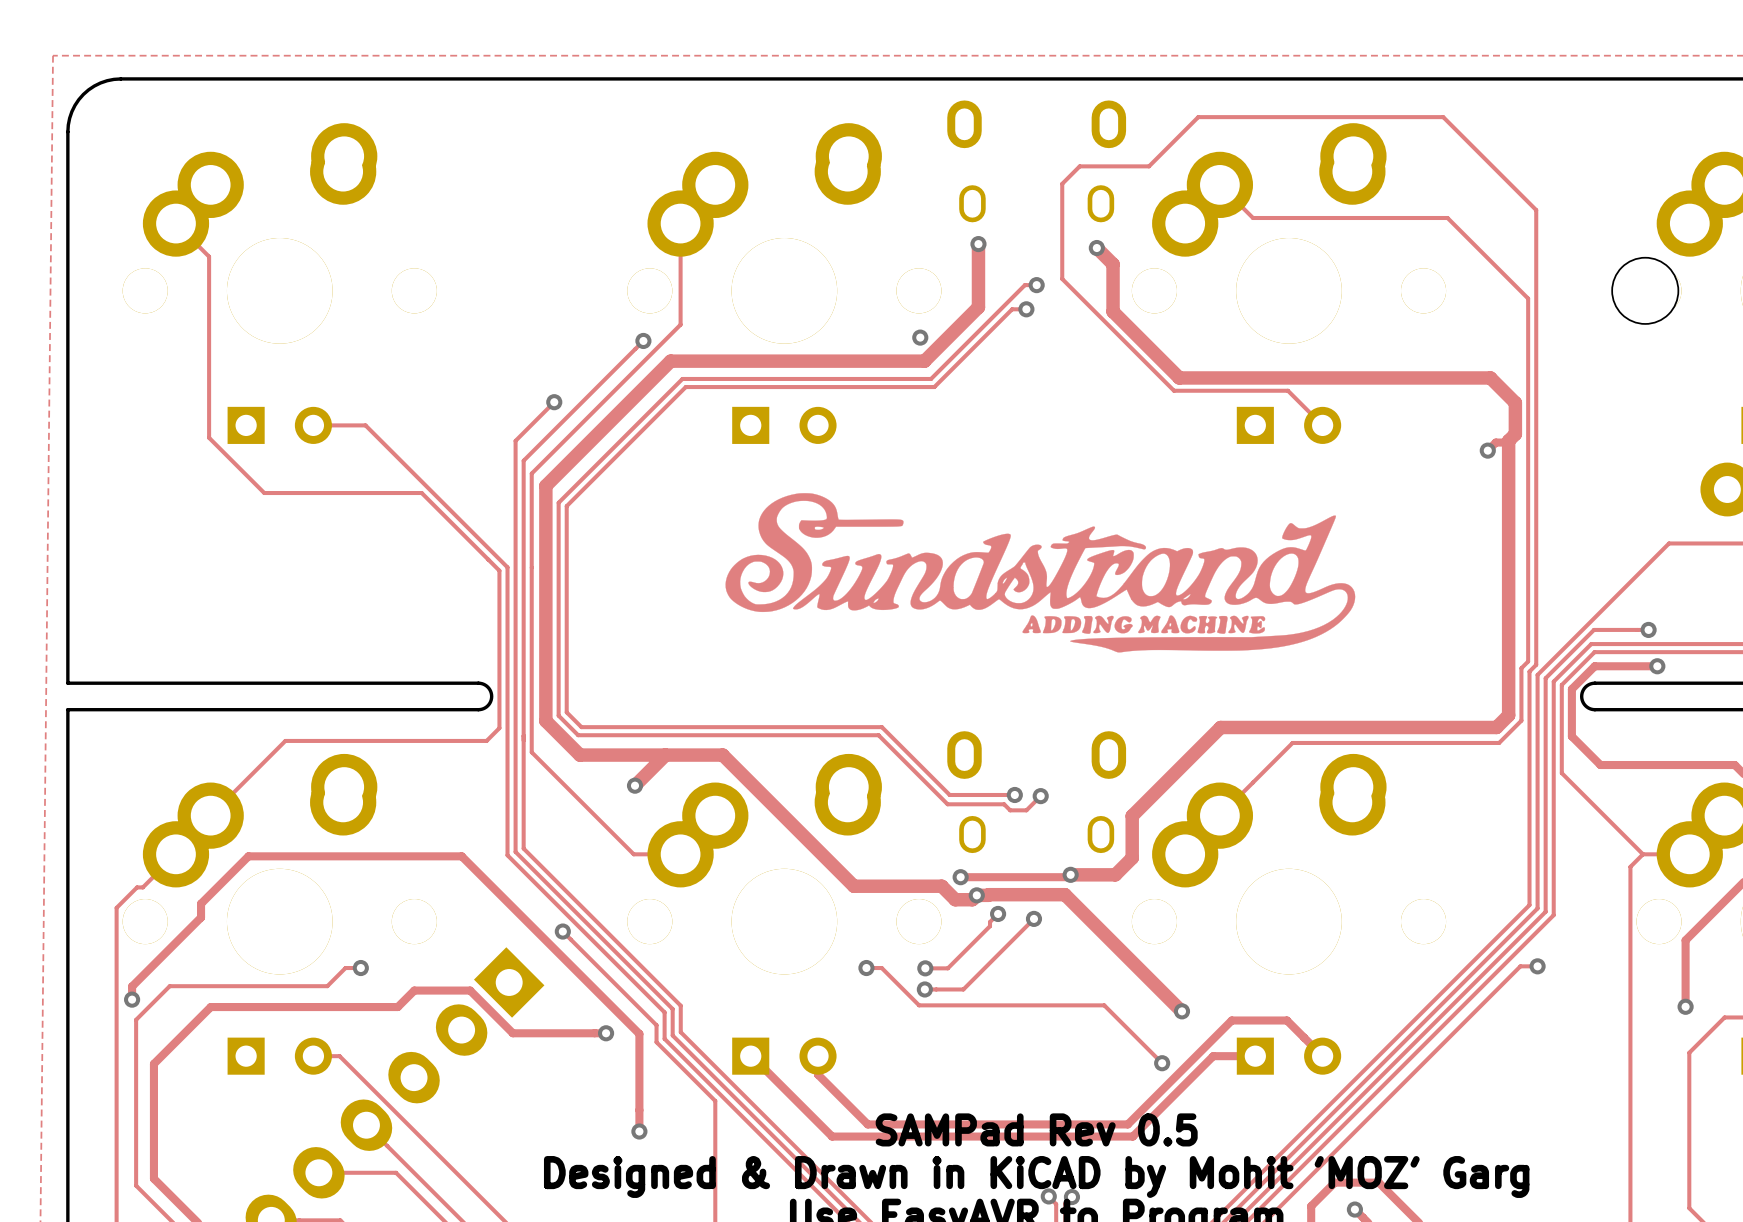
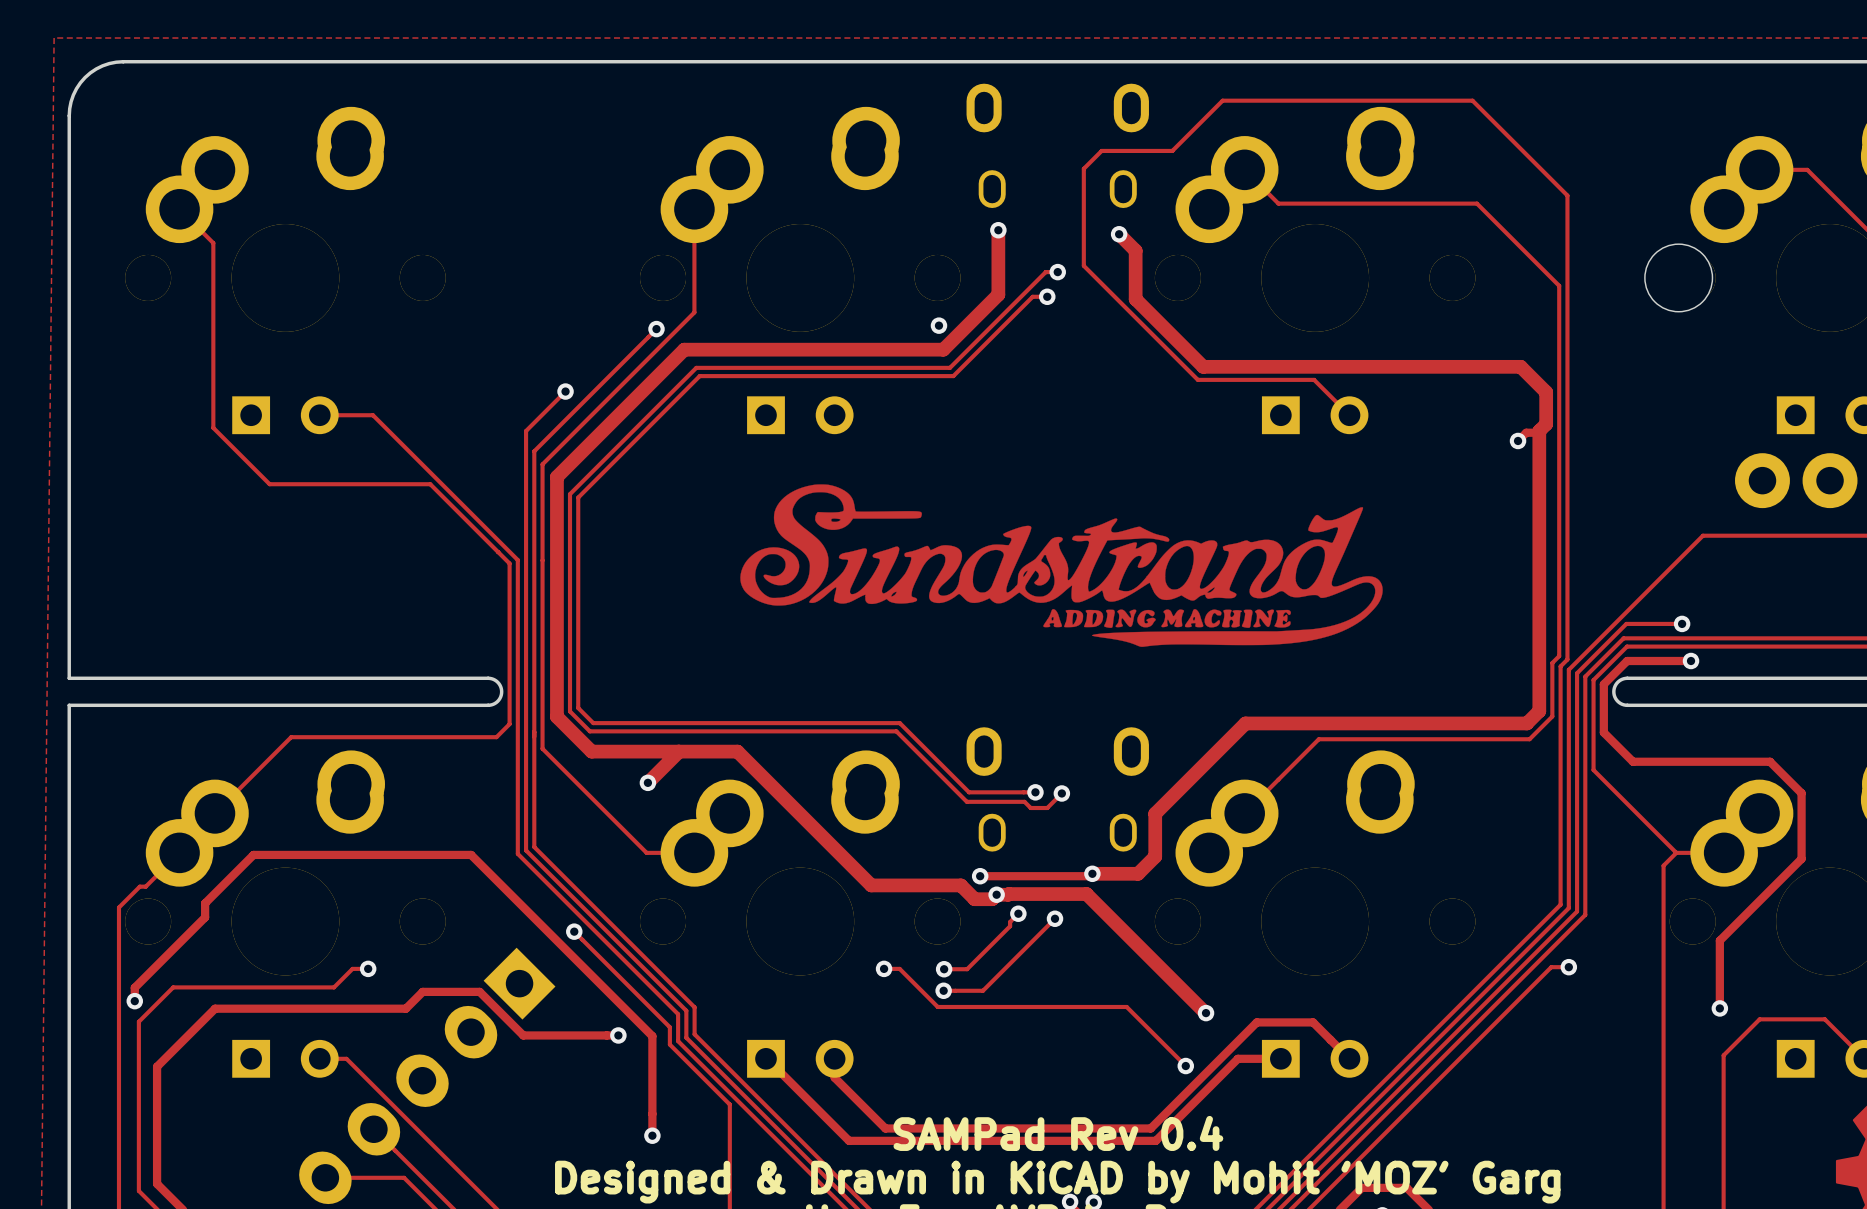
text: SAMPad Rev 0.5 (1036, 1129) -> SAMPad Rev 0.4 (1058, 1133)

